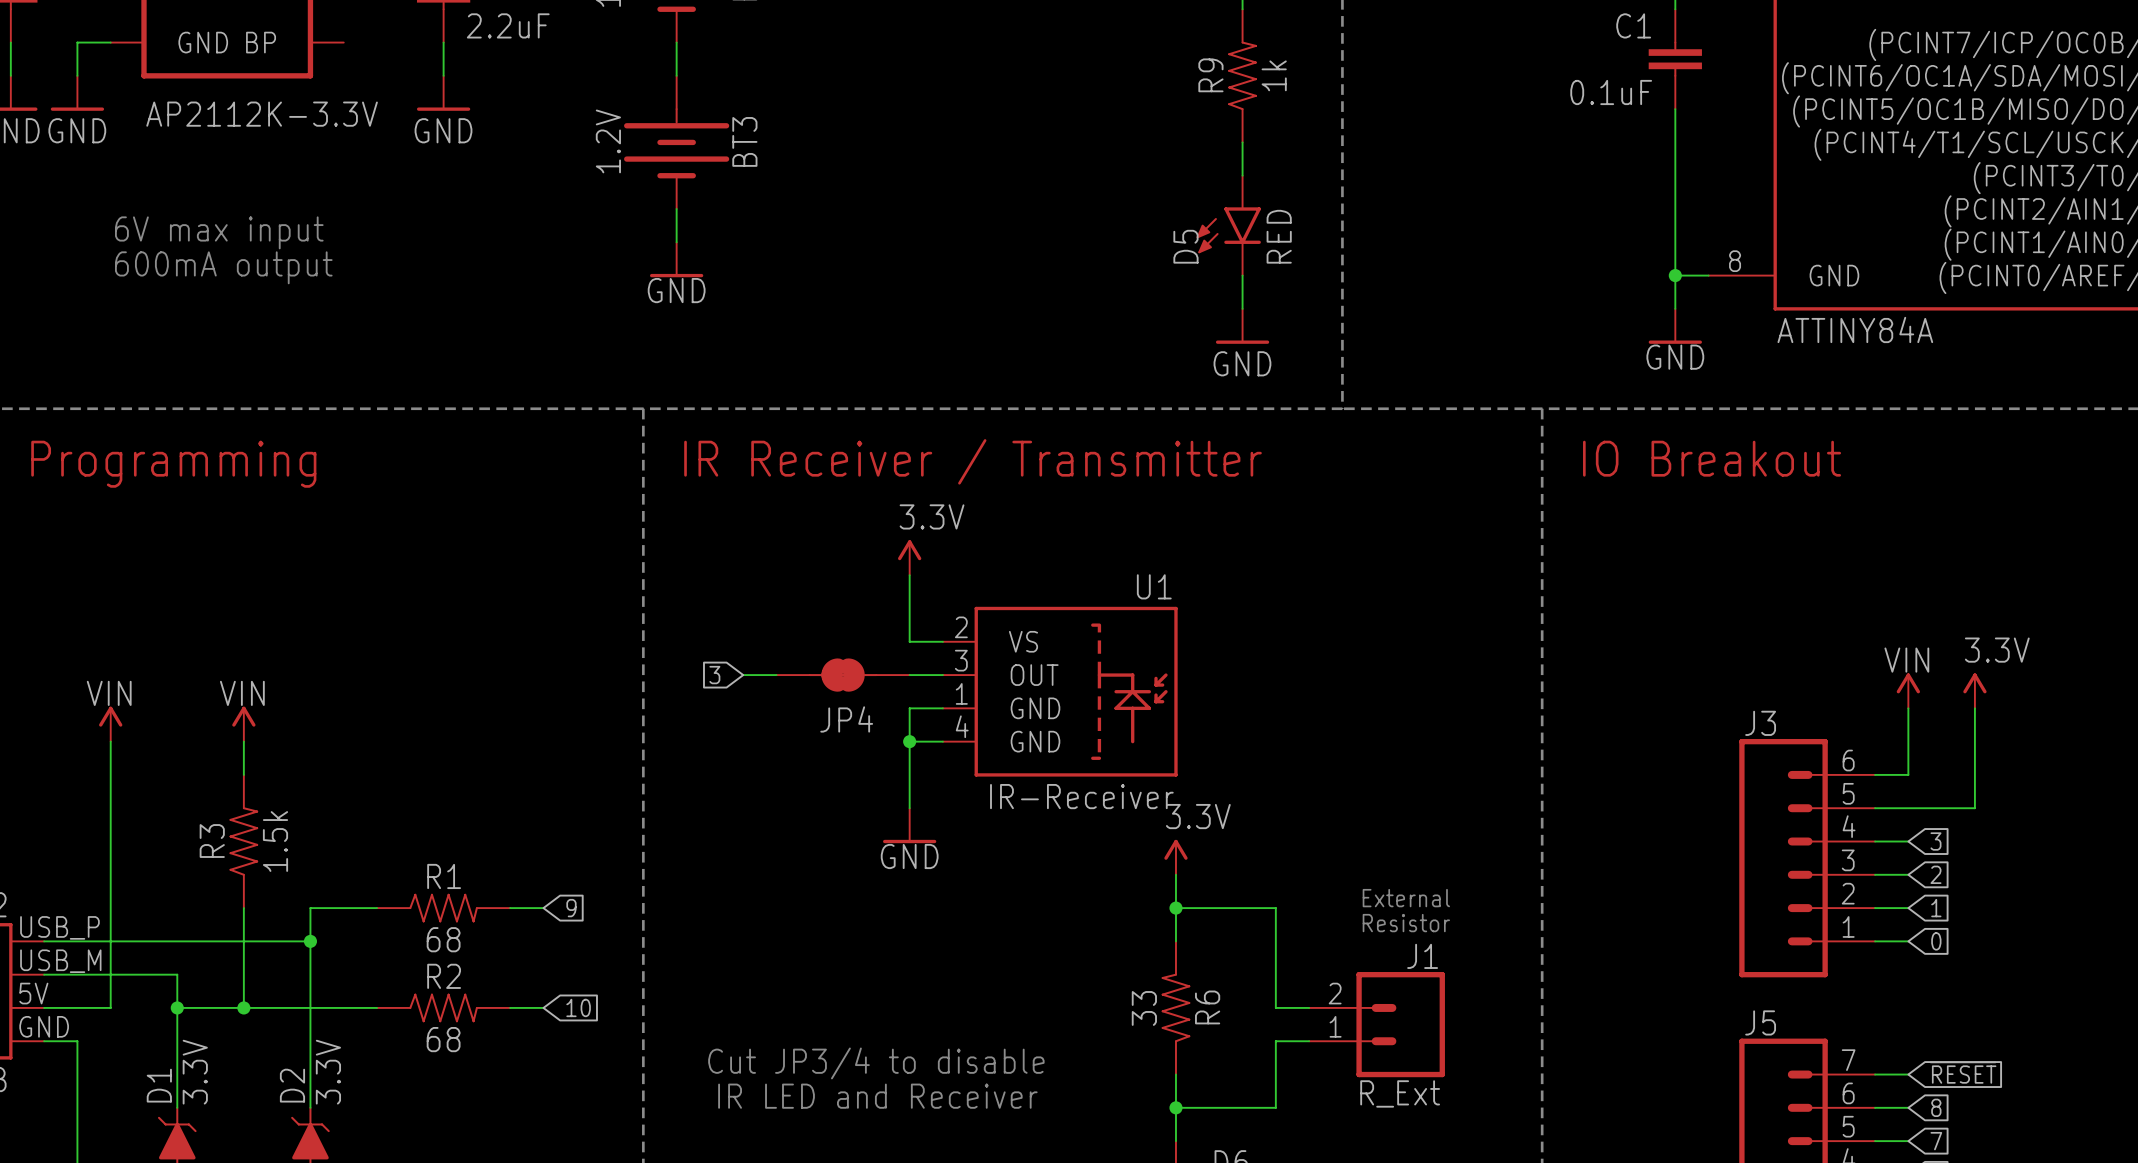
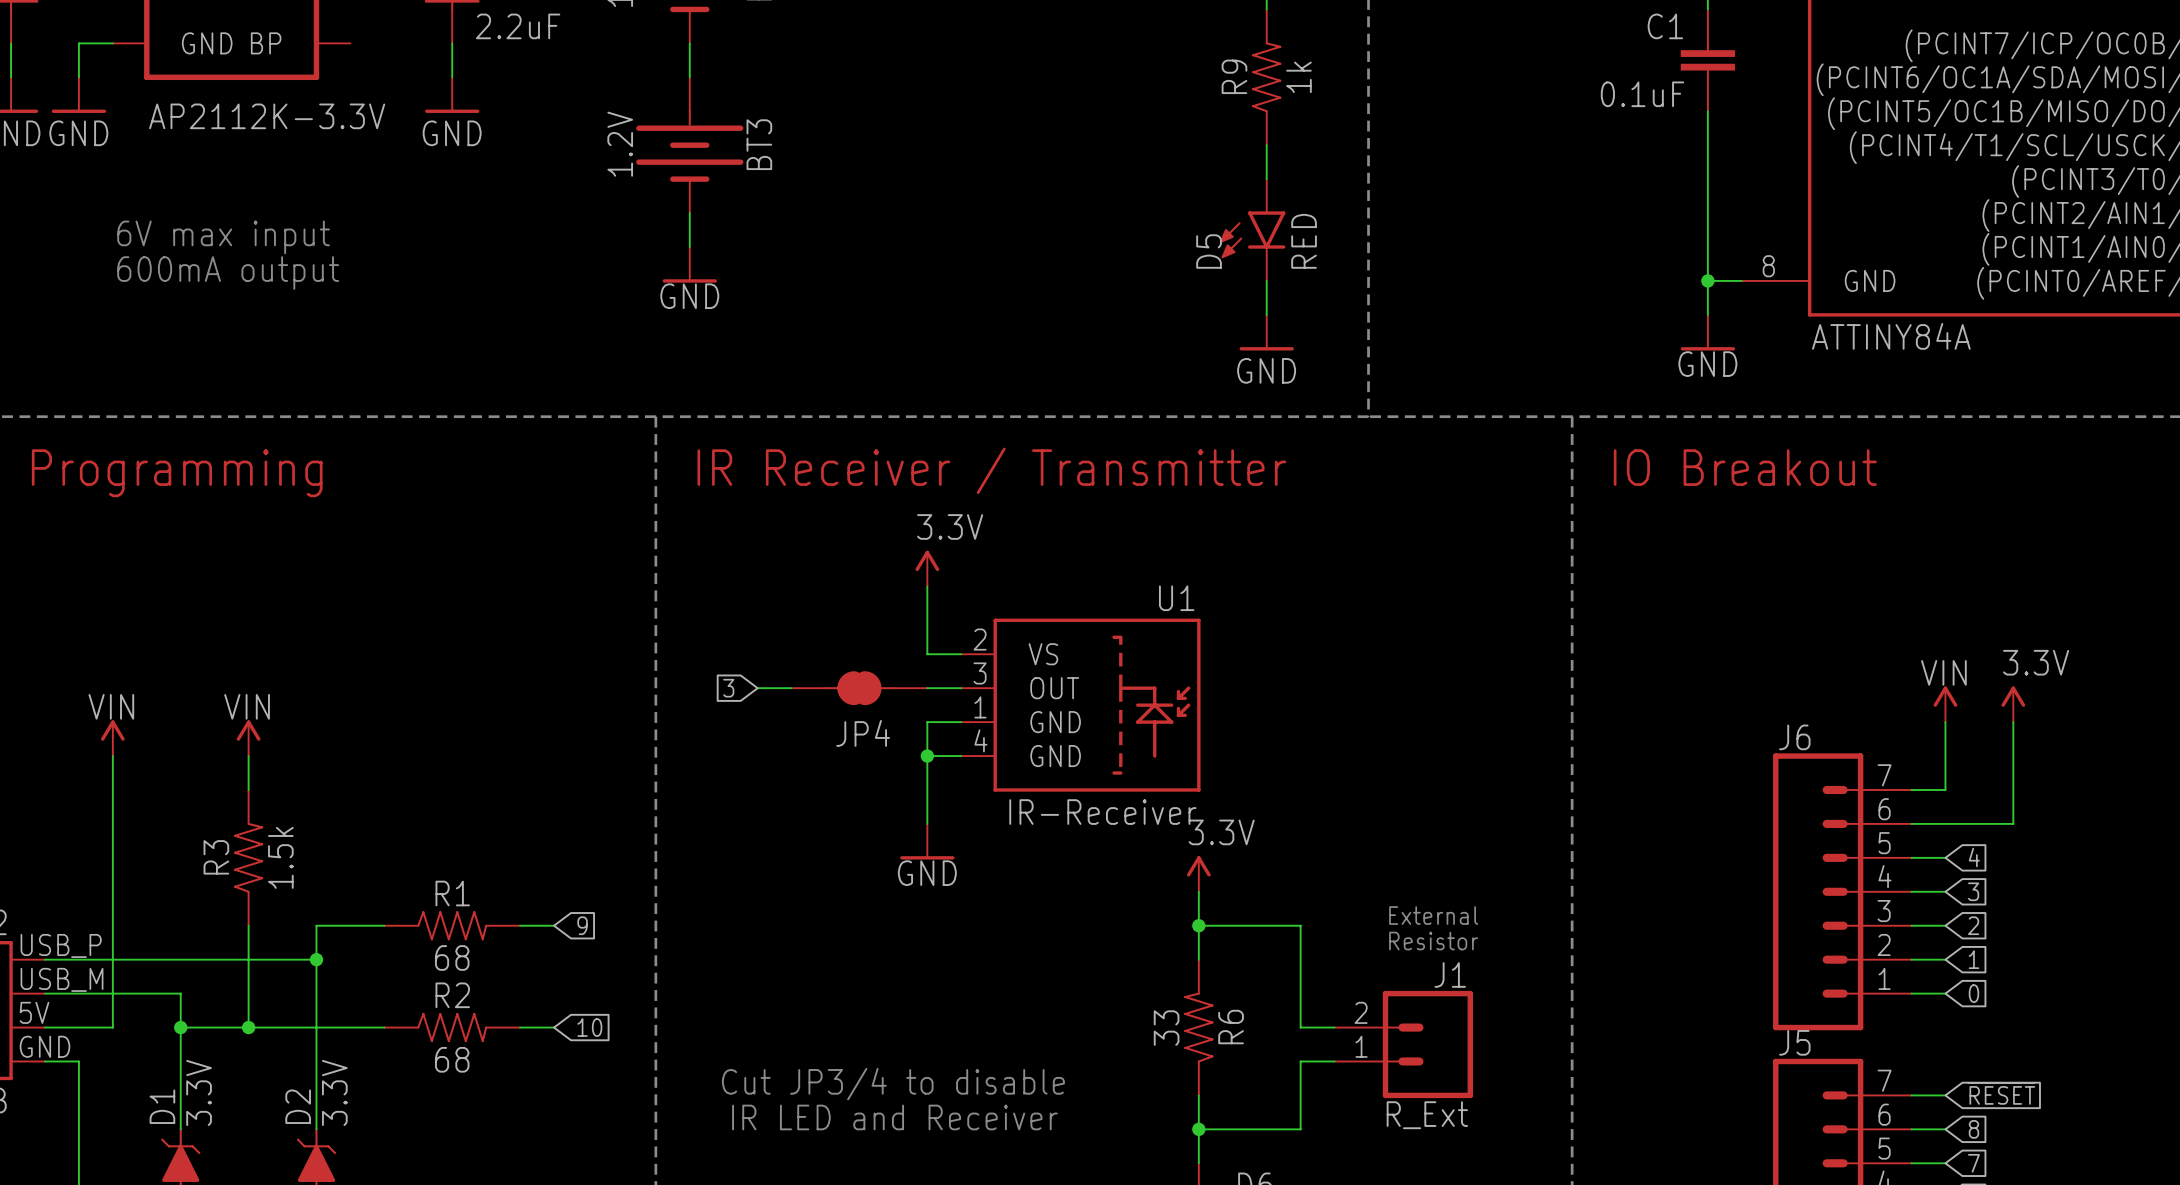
global label: 3 (1935, 841) -> 4 (1974, 857)
J3: (1807, 858) -> none
J6: none -> (1842, 891)
global label: 2 (1935, 874) -> 3 (1973, 891)
global label: 1 (1936, 908) -> 2 (1973, 925)
global label: 0 (1936, 941) -> 1 (1973, 959)
wire: none -> (1911, 993) (1945, 993)
global label: none -> 0 (1973, 993)

